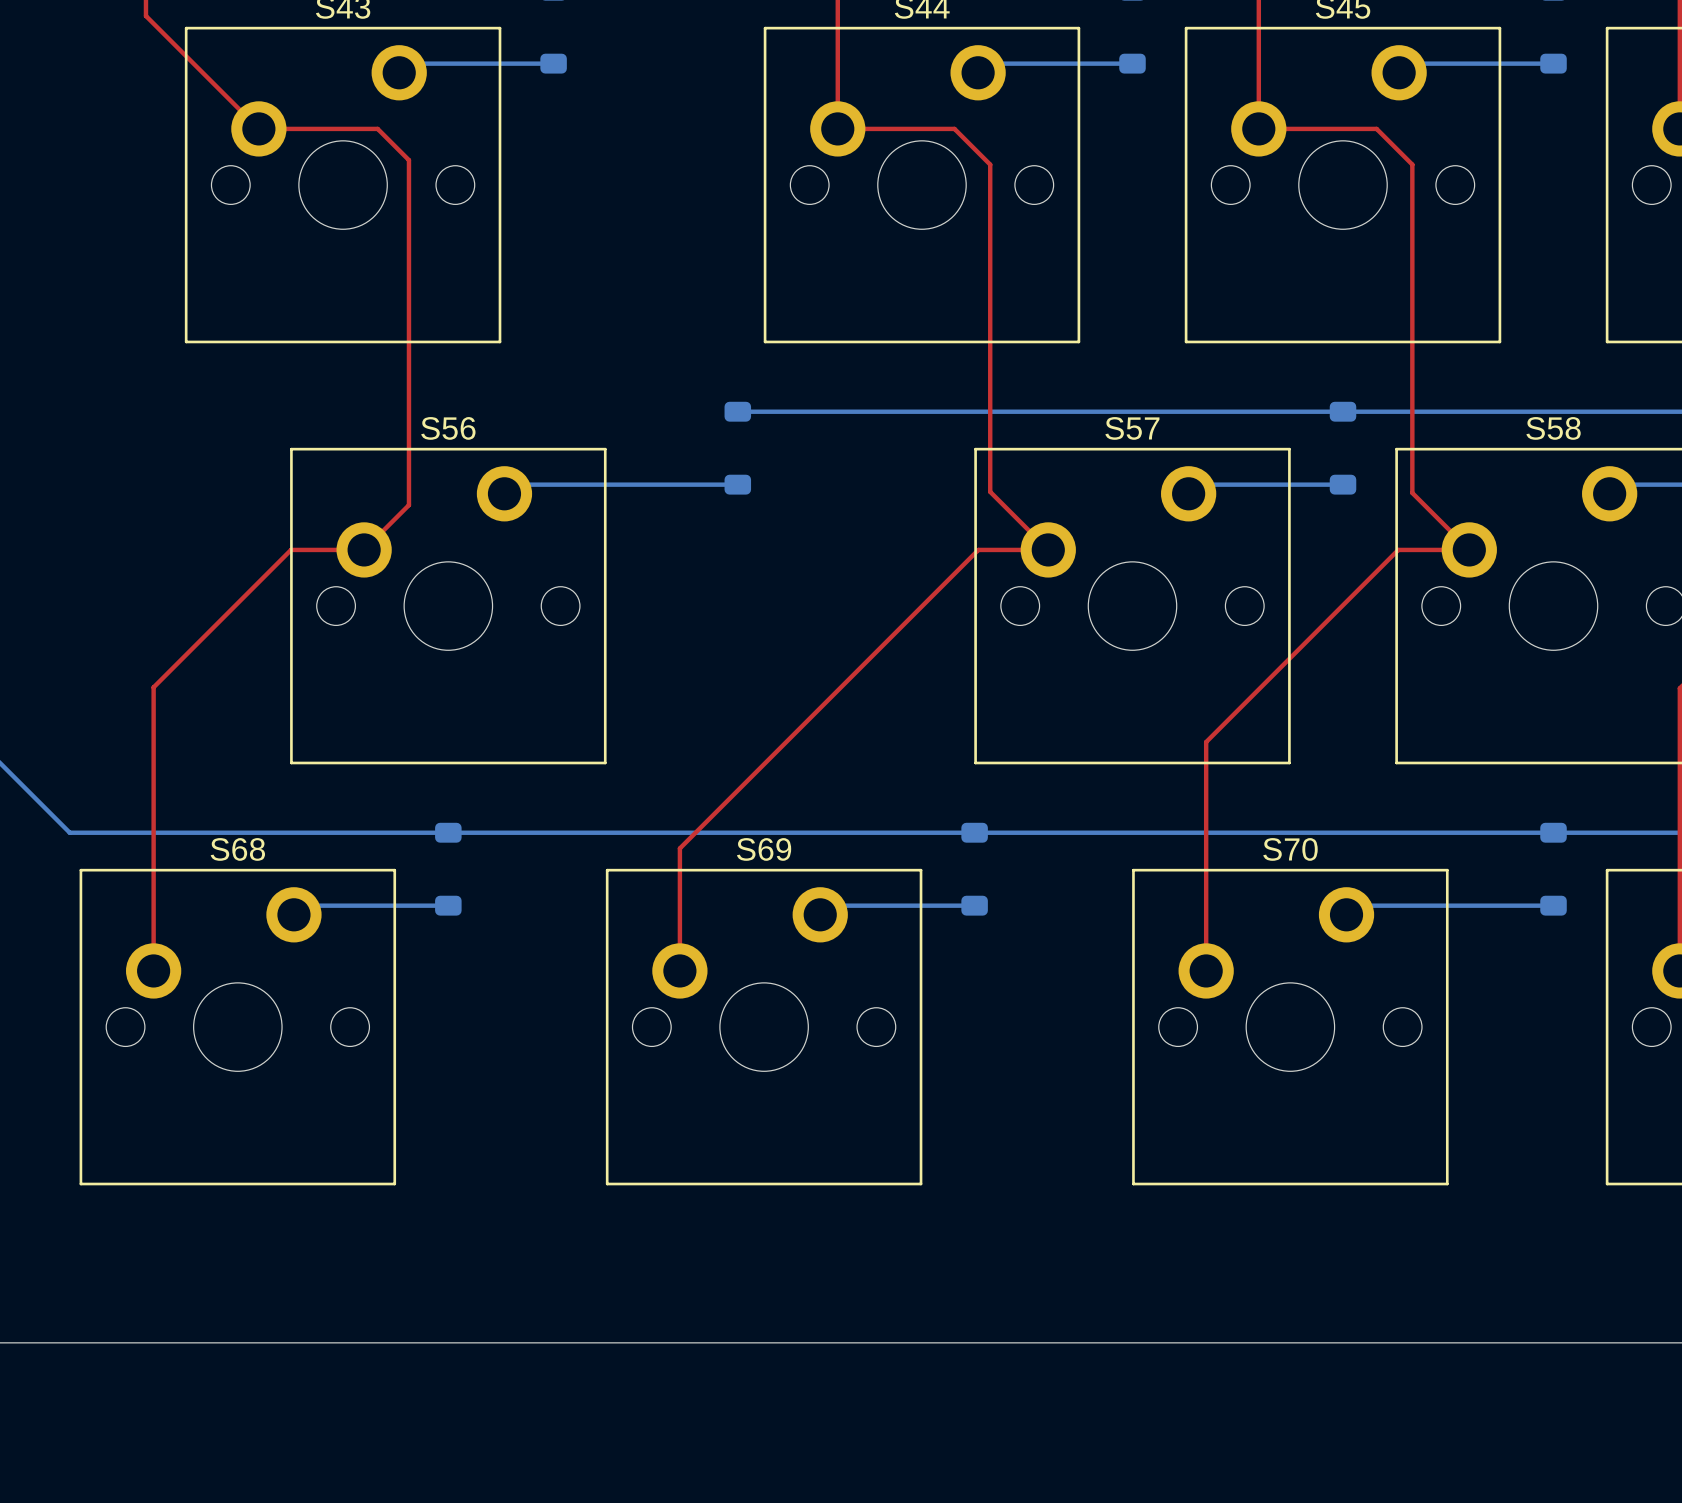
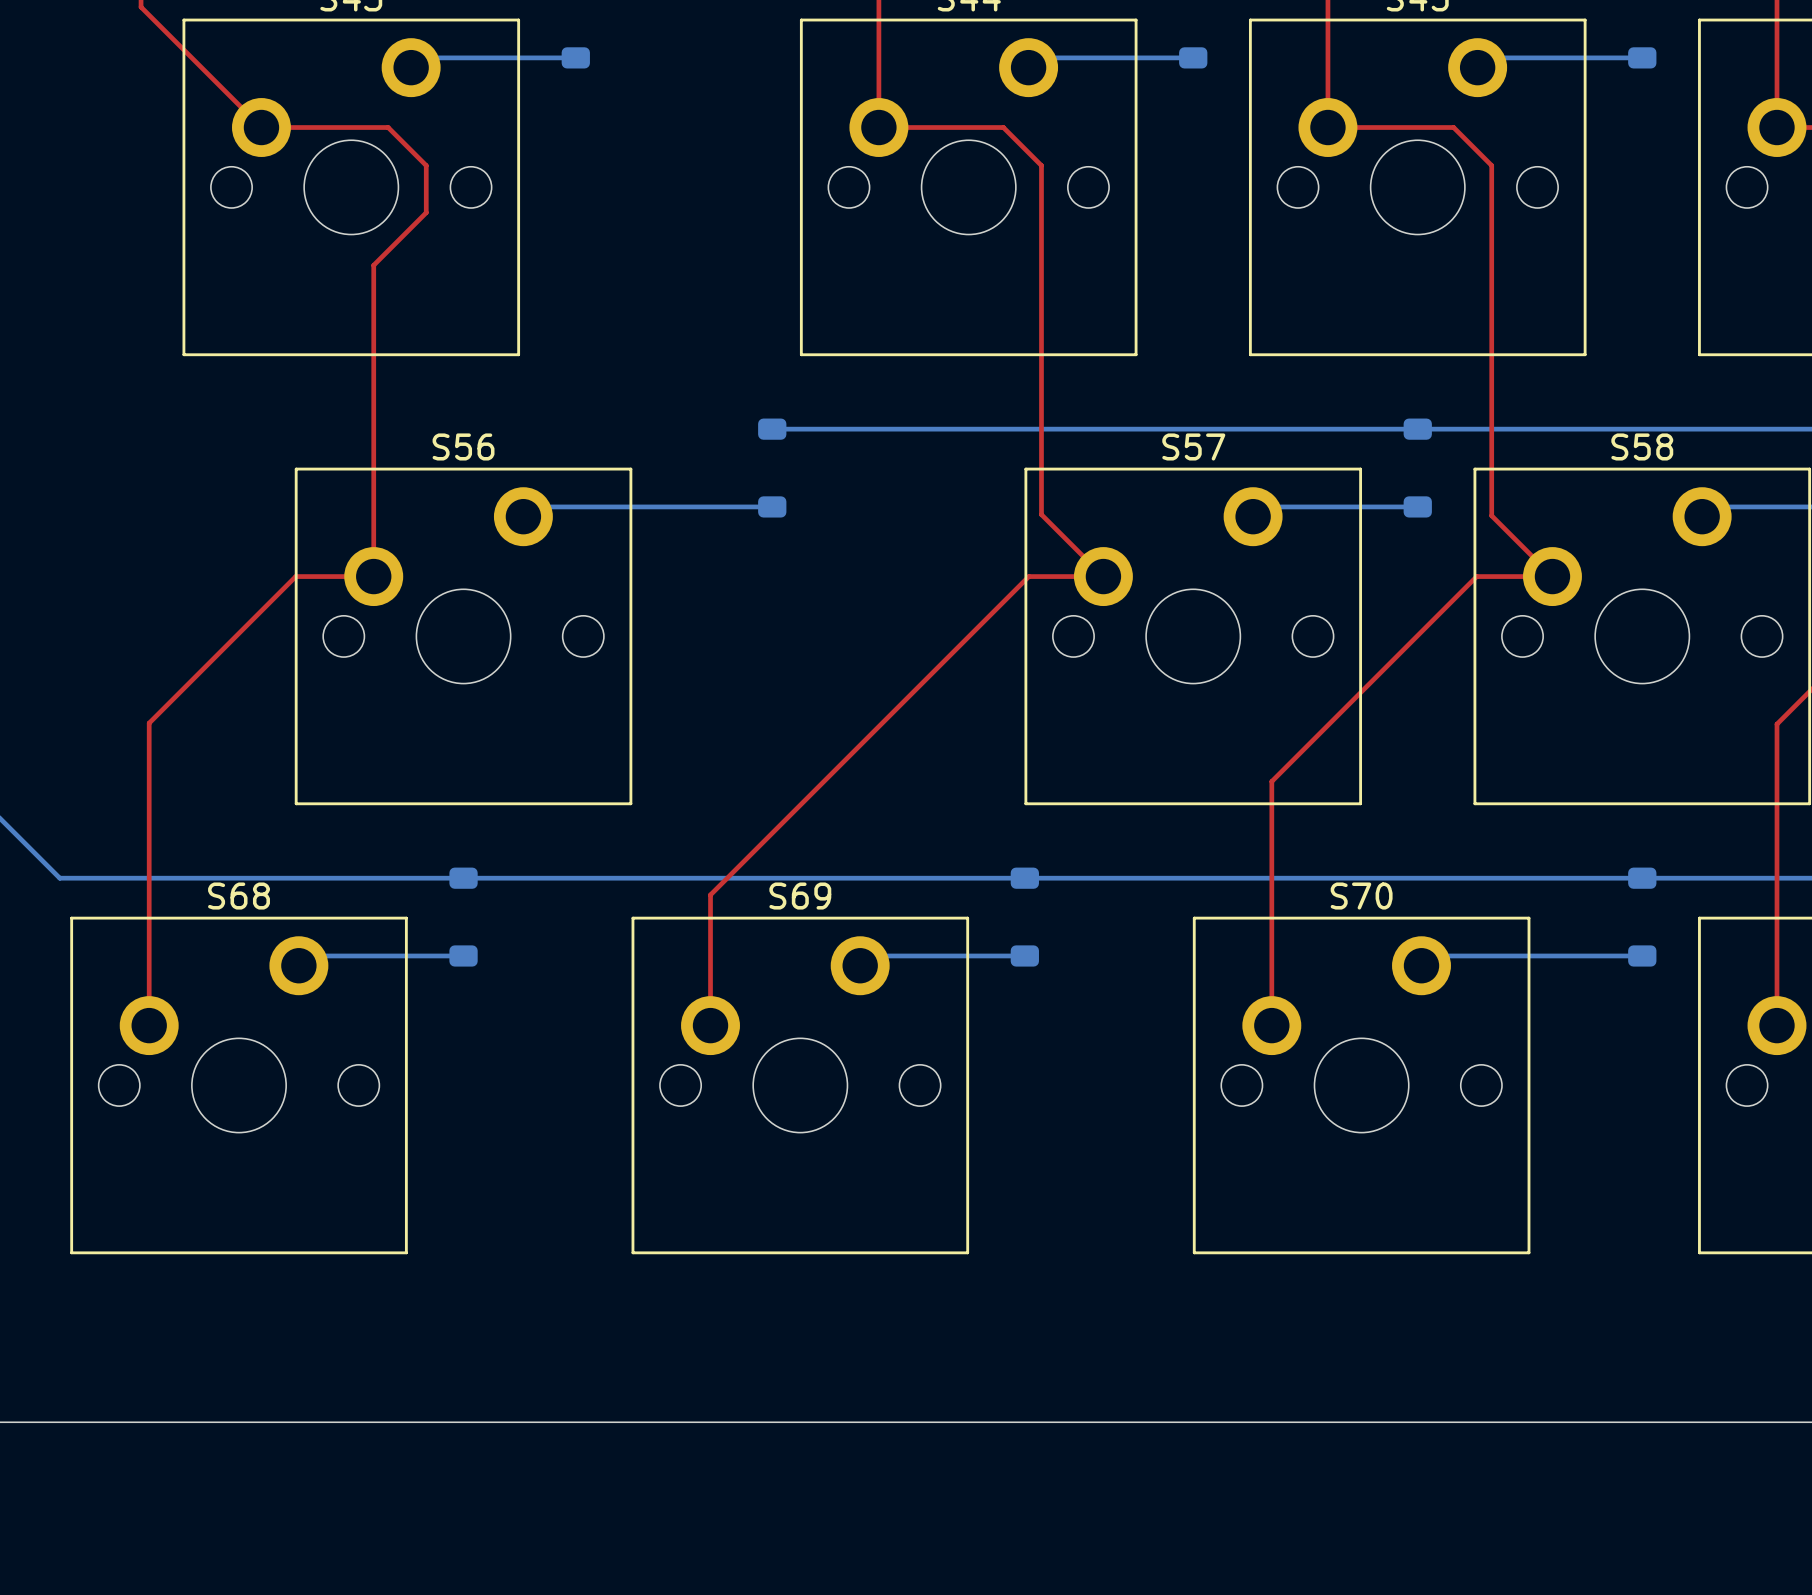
top track: (408, 160) (408, 505) (364, 549) -> (421, 160) (426, 165) (426, 212) (373, 265) (373, 576)

